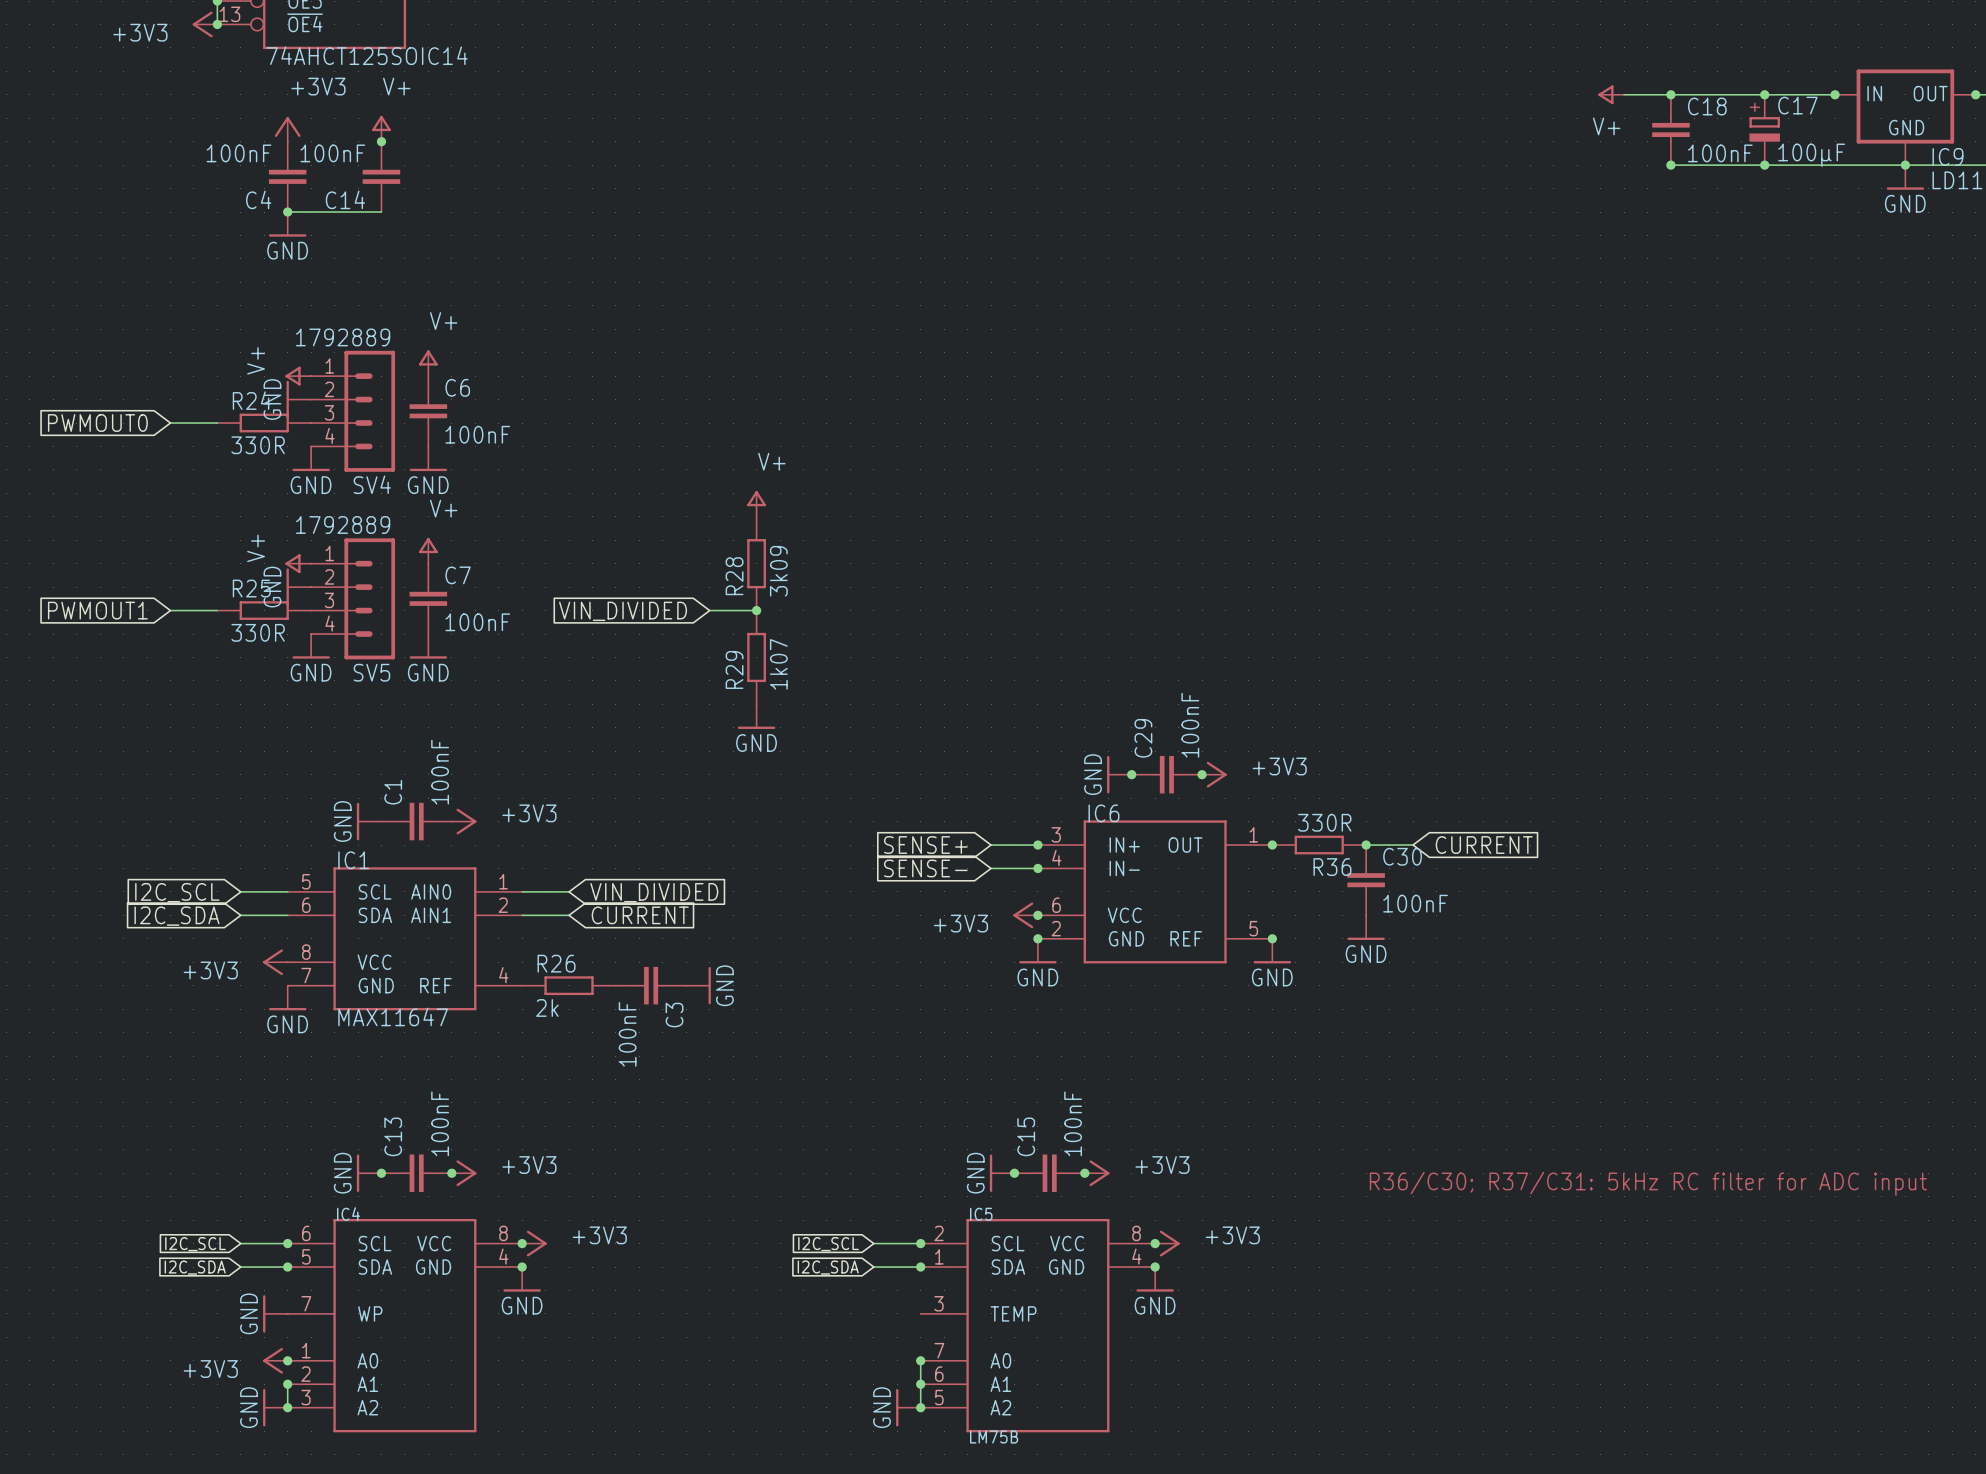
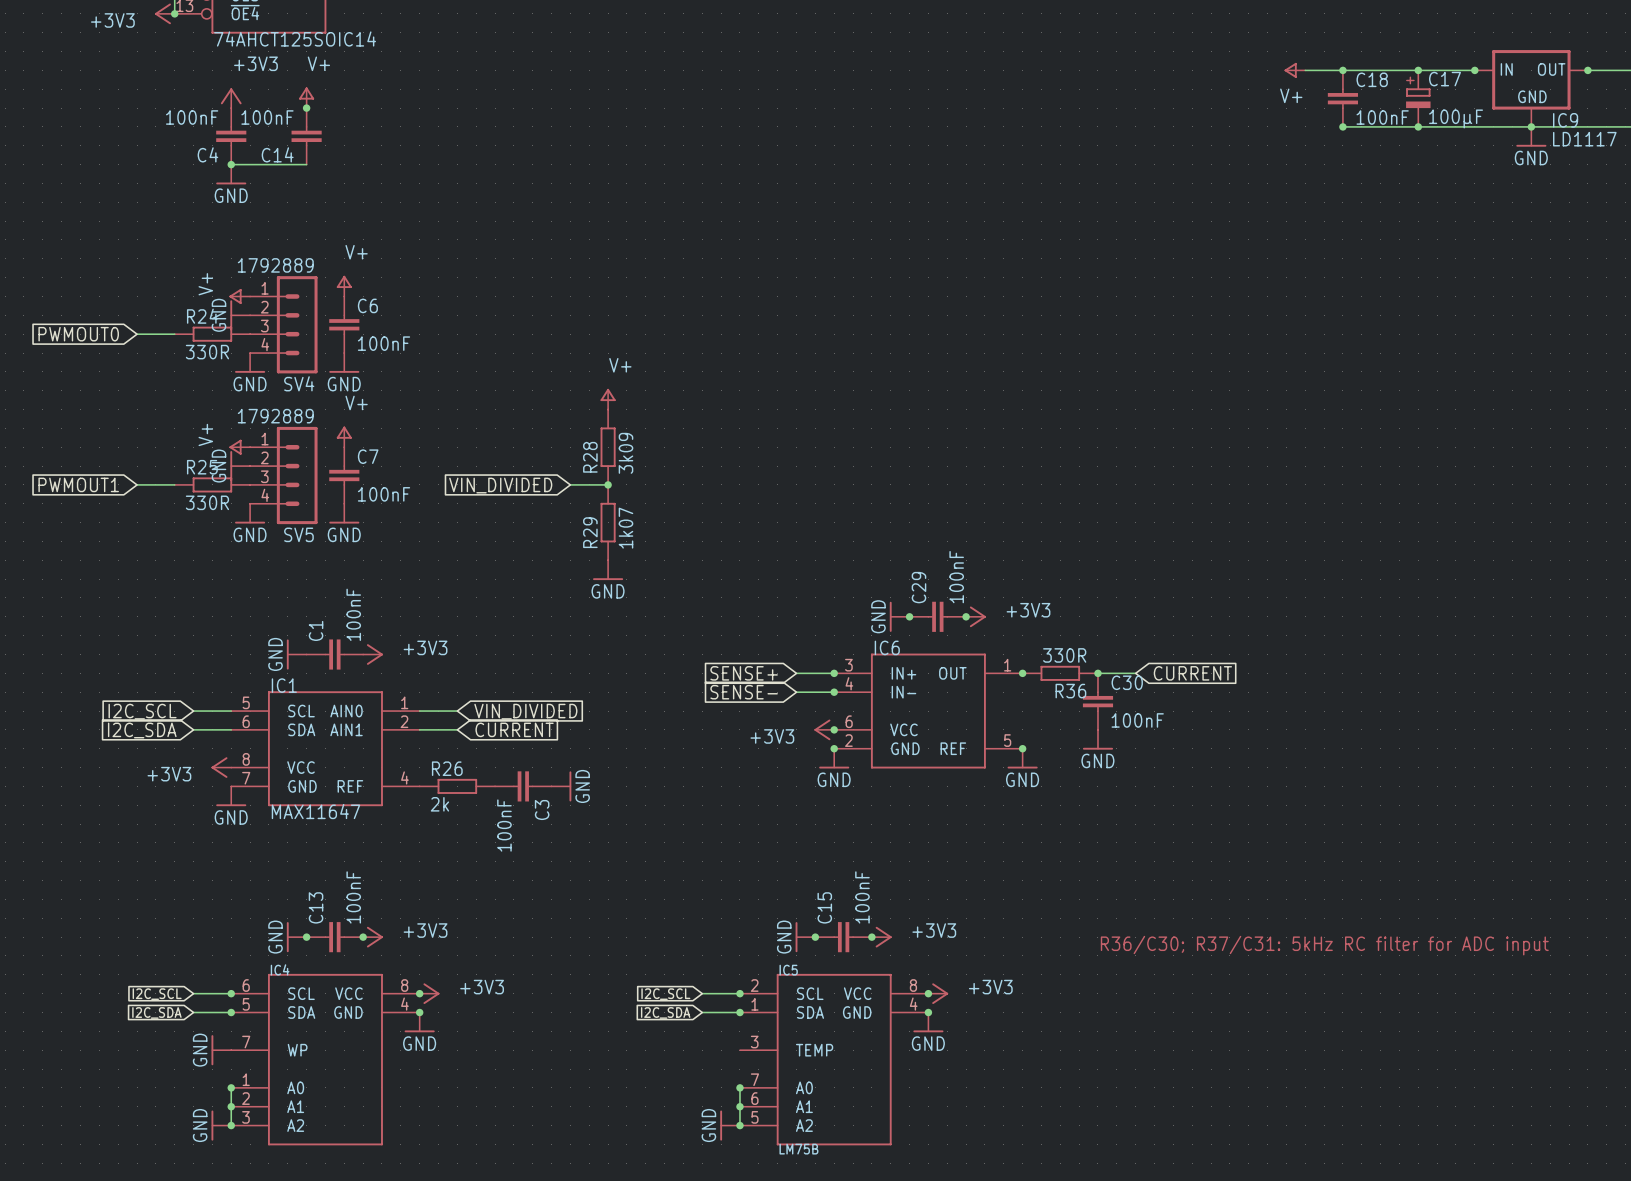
power symbol: +3V3 (275, 1360) -> none
wire: none -> (231, 1087) (231, 1106)

